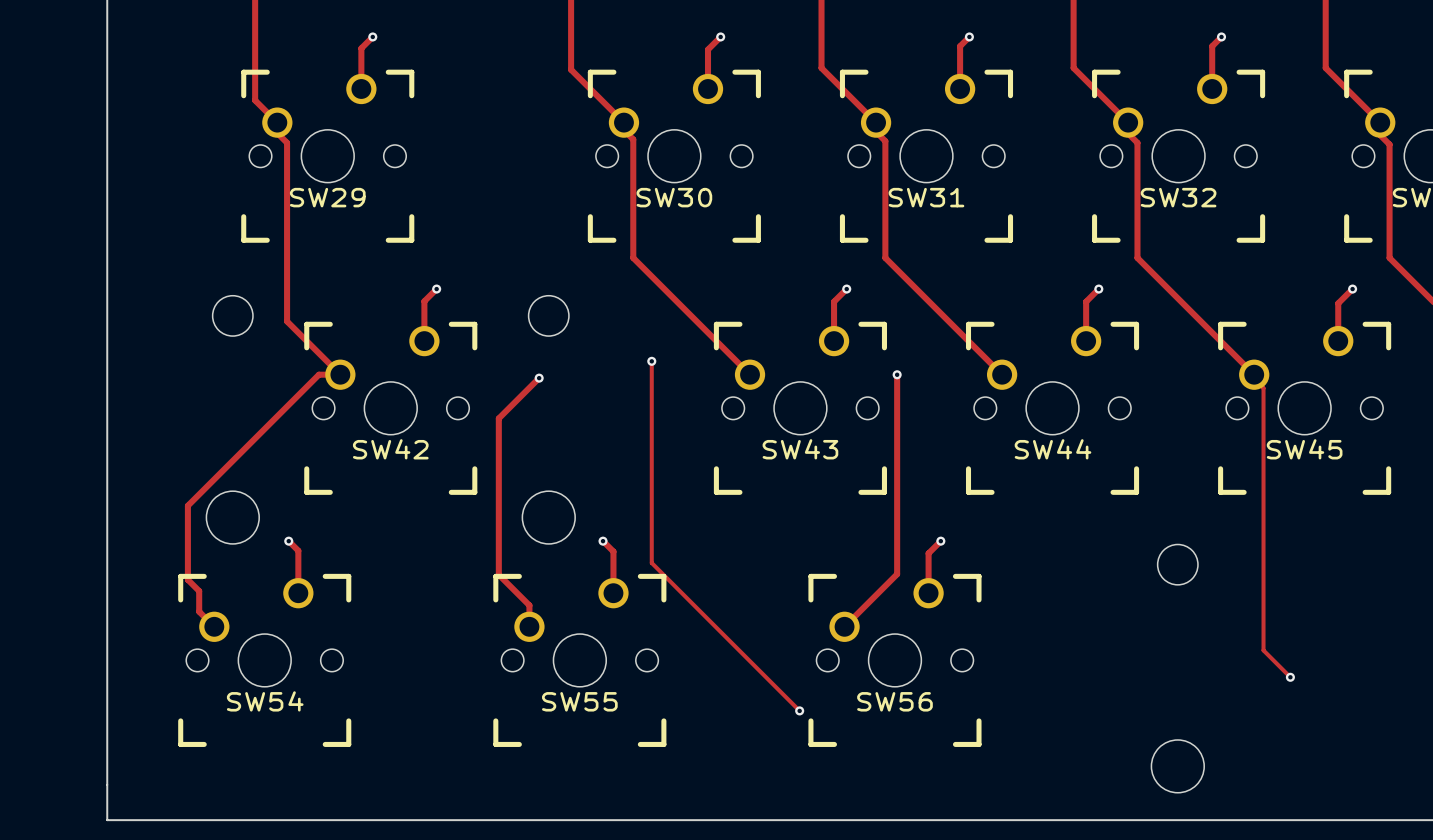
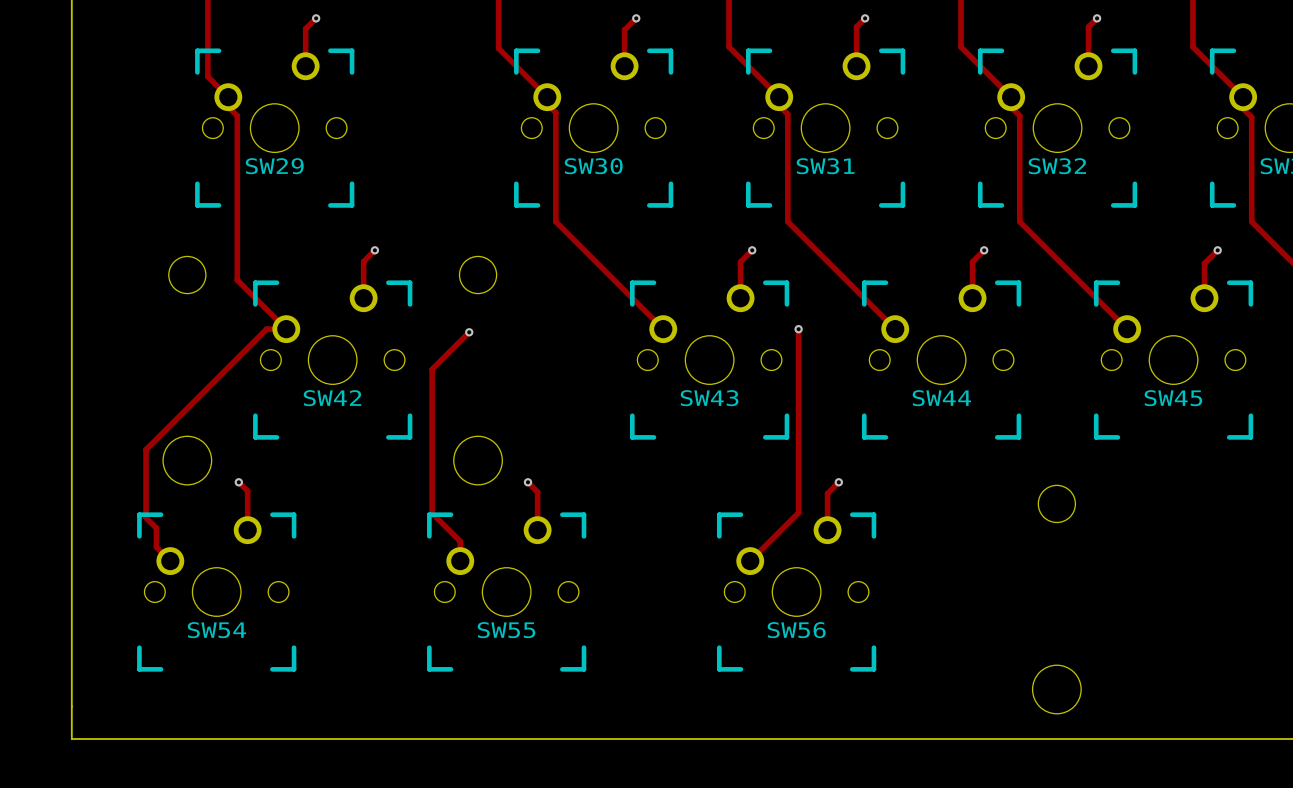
track: (651, 361) (651, 563) (799, 710) -> none
via: (651, 361) -> none
track: (1254, 374) (1254, 378) (1263, 388) (1263, 650) (1290, 677) -> none
via: (1290, 677) -> none
via: (799, 710) -> none

